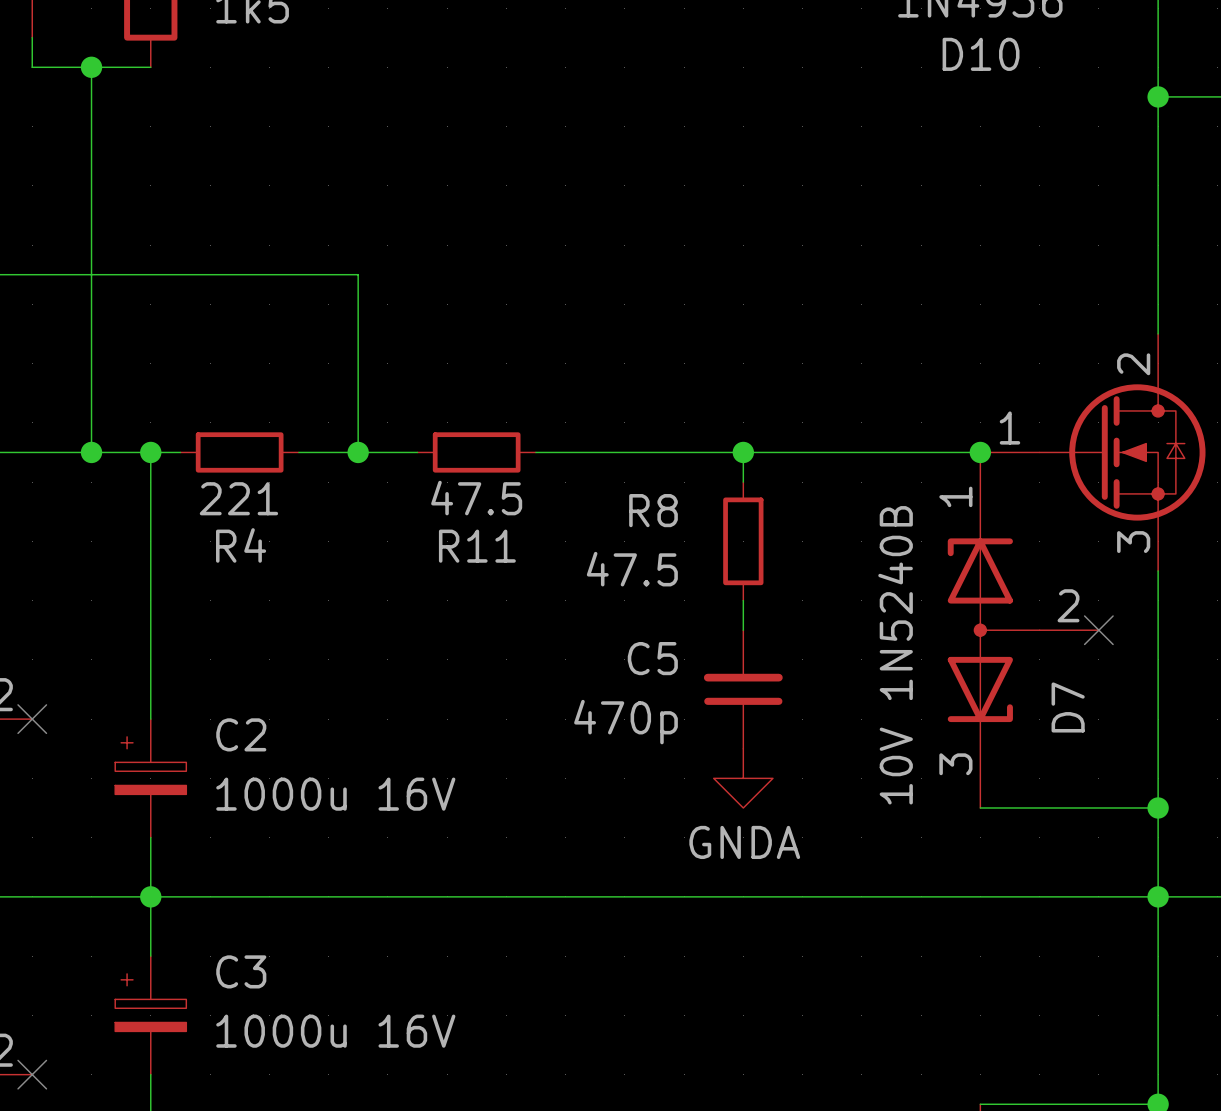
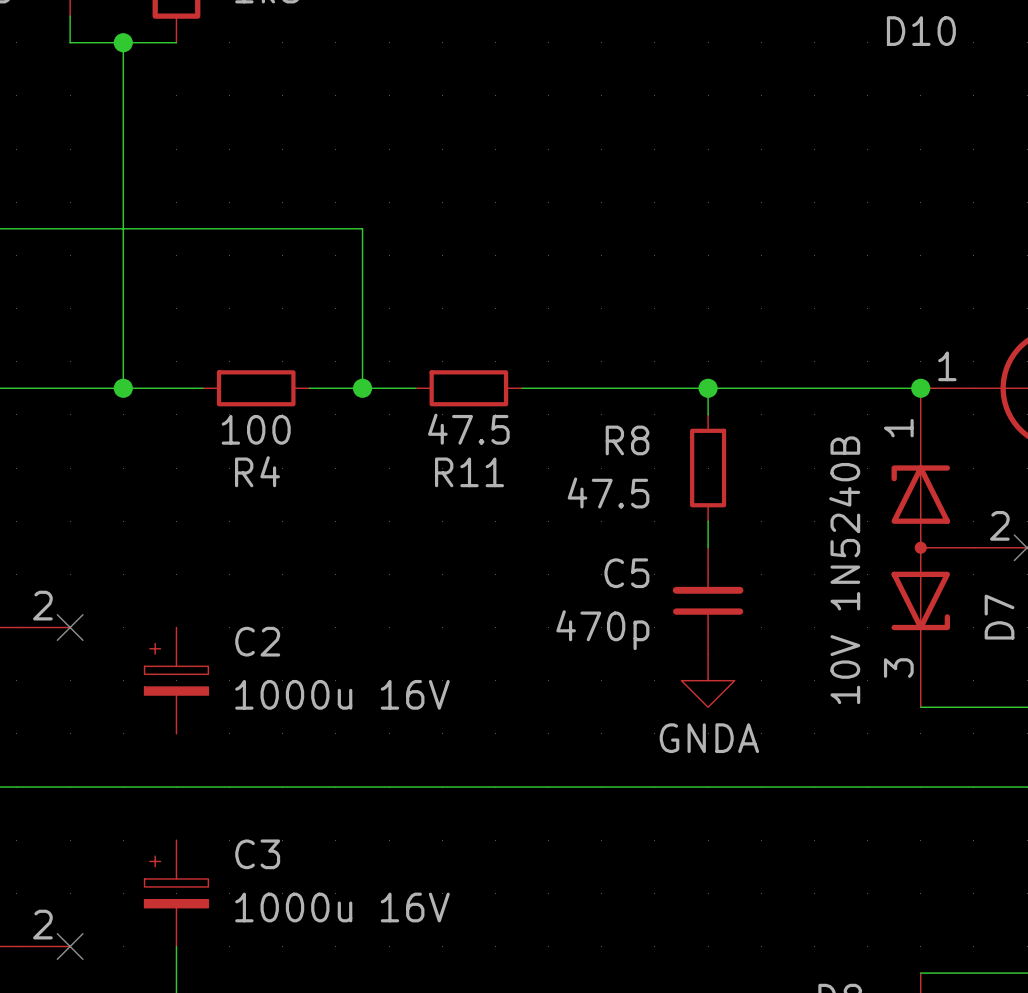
wire: (150, 452) (150, 719) -> none
junction: (150, 452) -> none
R4 value: 221 (238, 498) -> 100 (256, 429)
wire: (150, 837) (150, 956) -> none
junction: (150, 896) -> none

